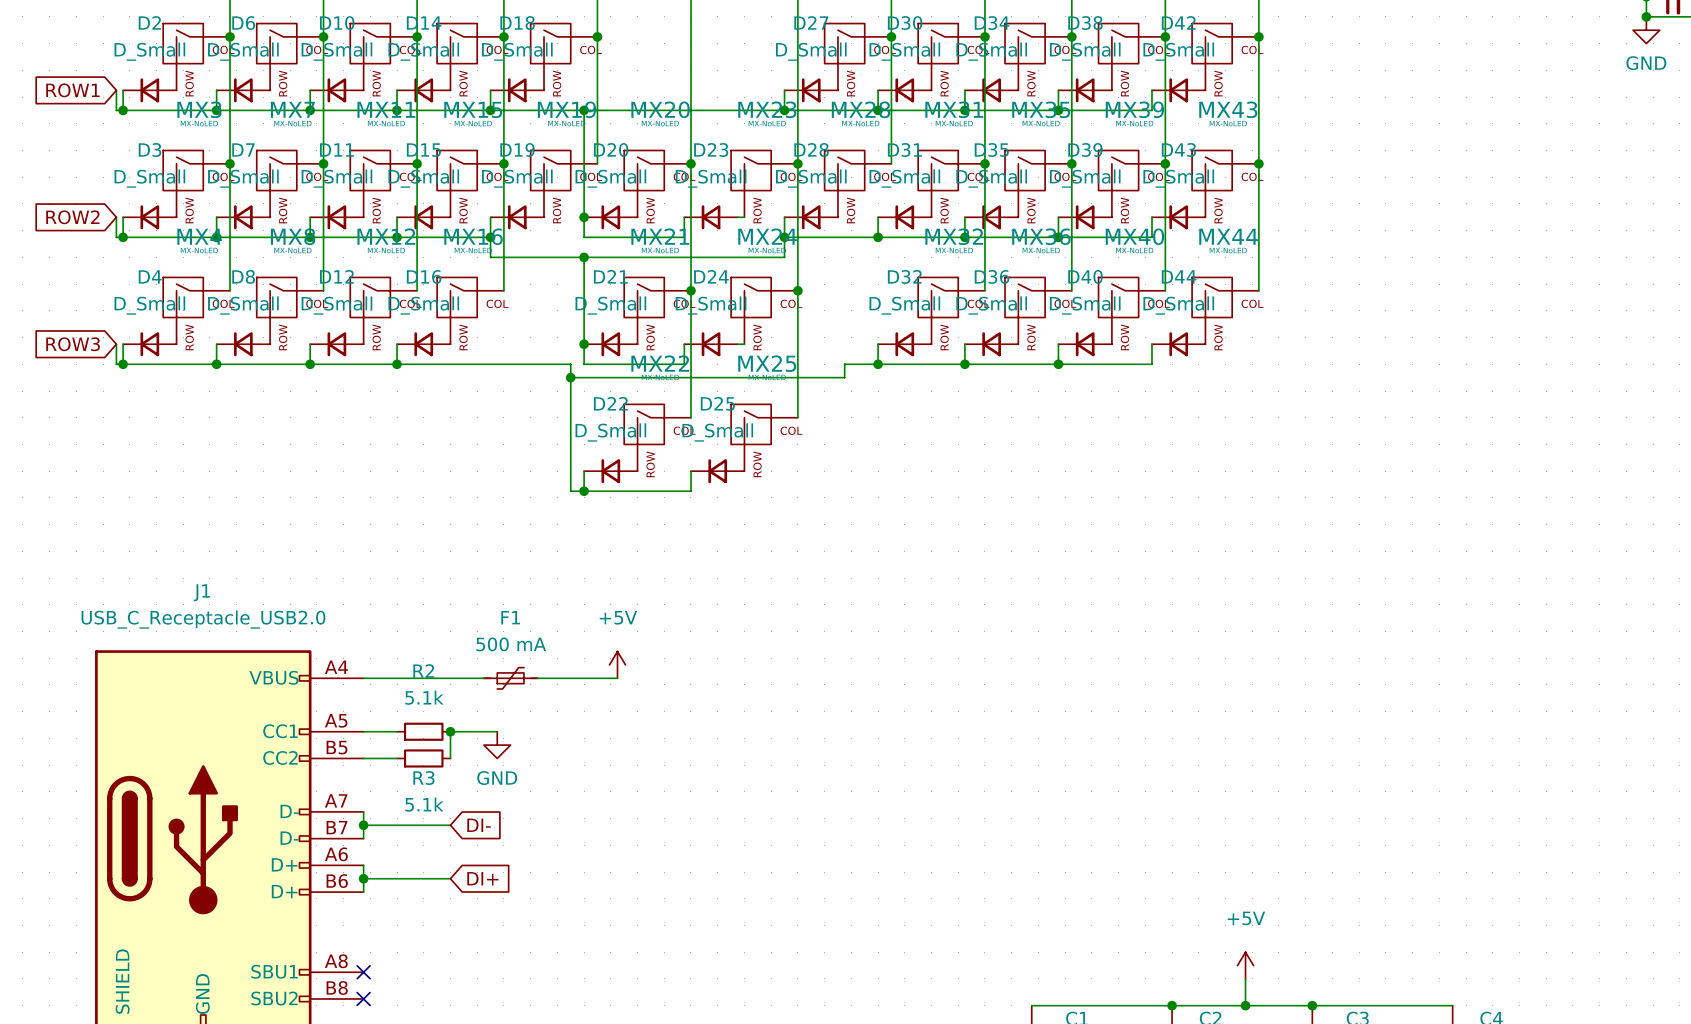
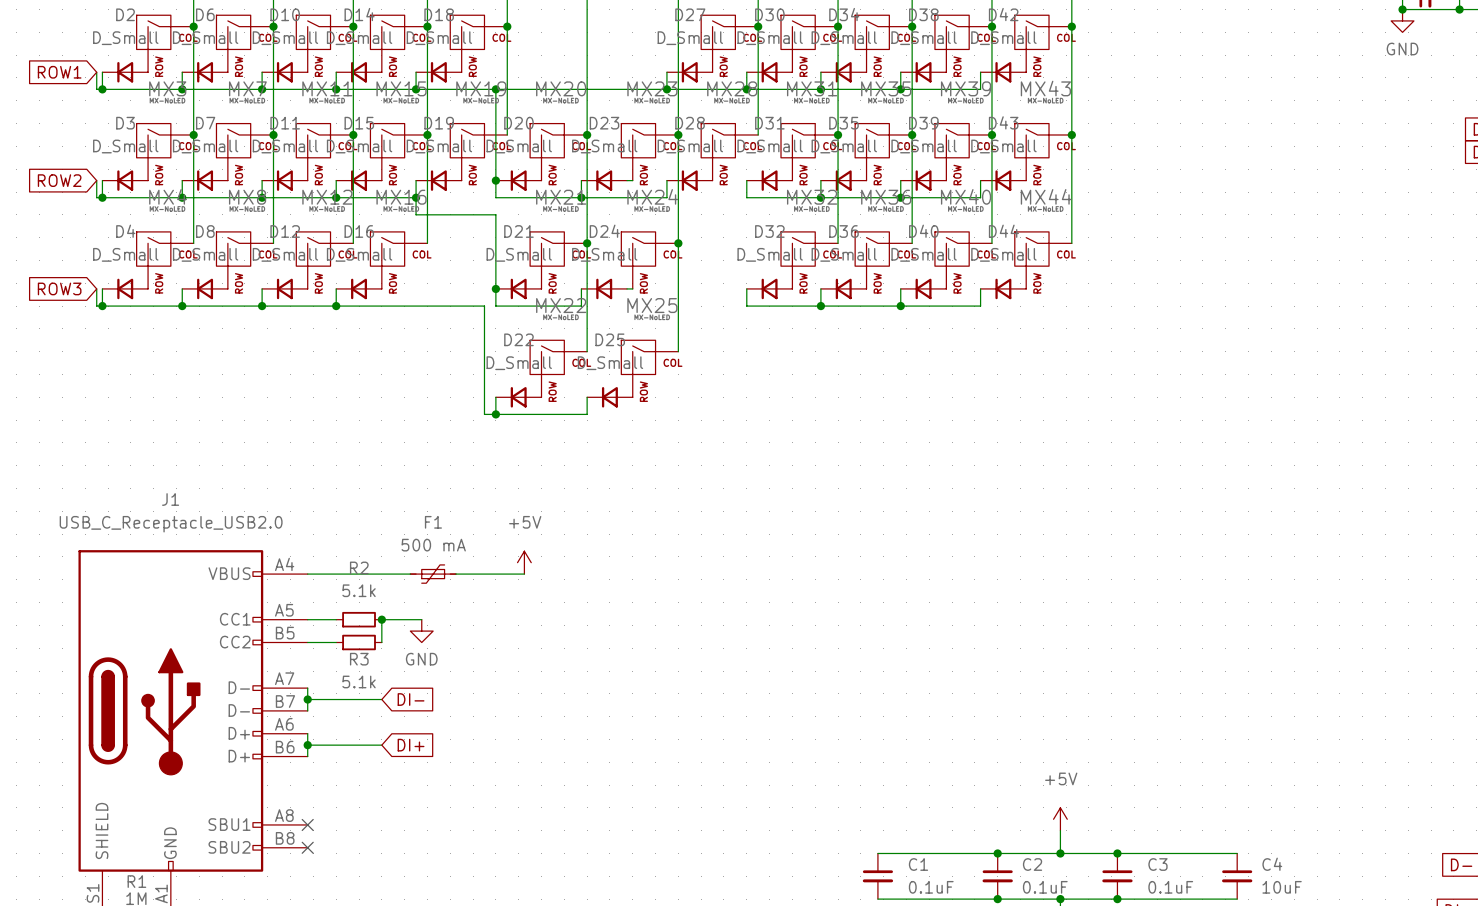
wire: none -> (581, 197) (666, 197)
junction: none -> (581, 197)
junction: (784, 237) -> none
wire: (878, 237) (784, 237) (784, 257) (584, 257) -> none
junction: (878, 237) -> none
junction: (584, 257) -> none
wire: (878, 364) (844, 364) (844, 377) (570, 377) -> none
junction: (878, 364) -> none
junction: (570, 377) -> none

